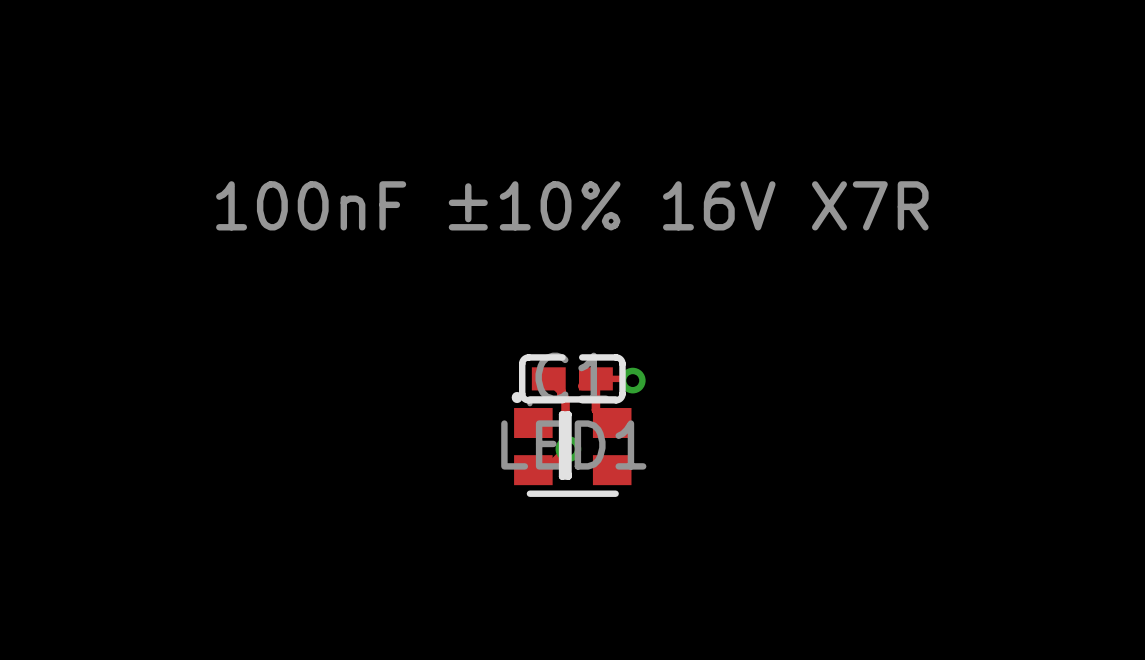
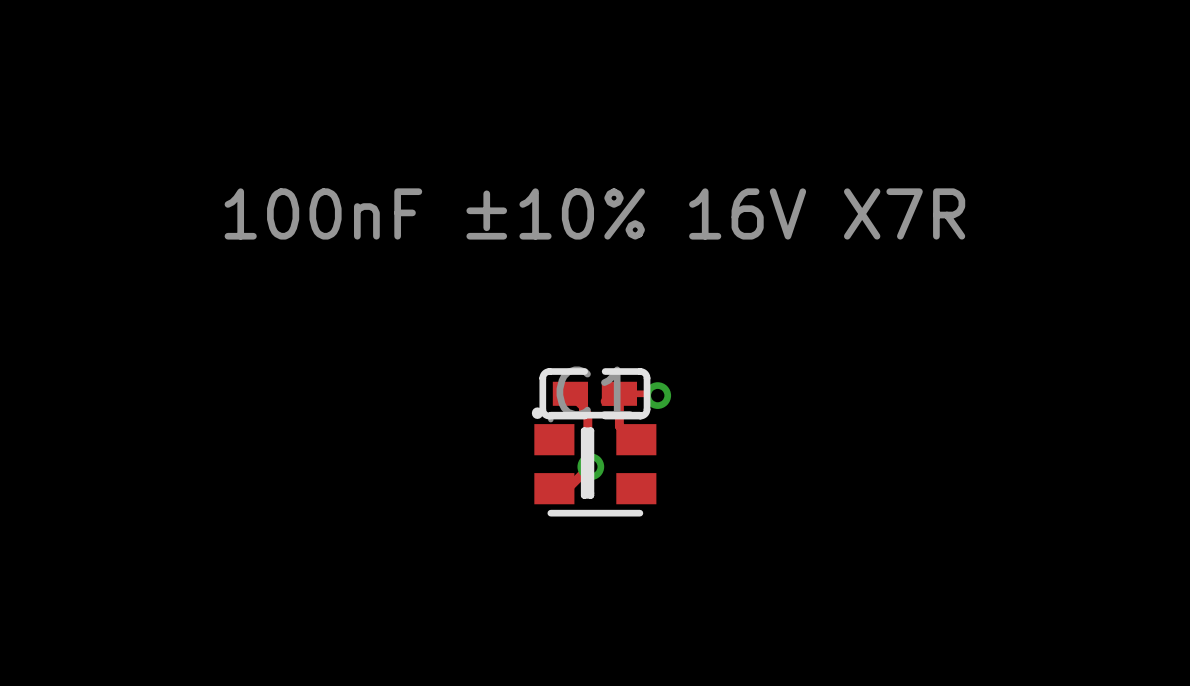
LED1 name: LED1 (573, 444) -> none

